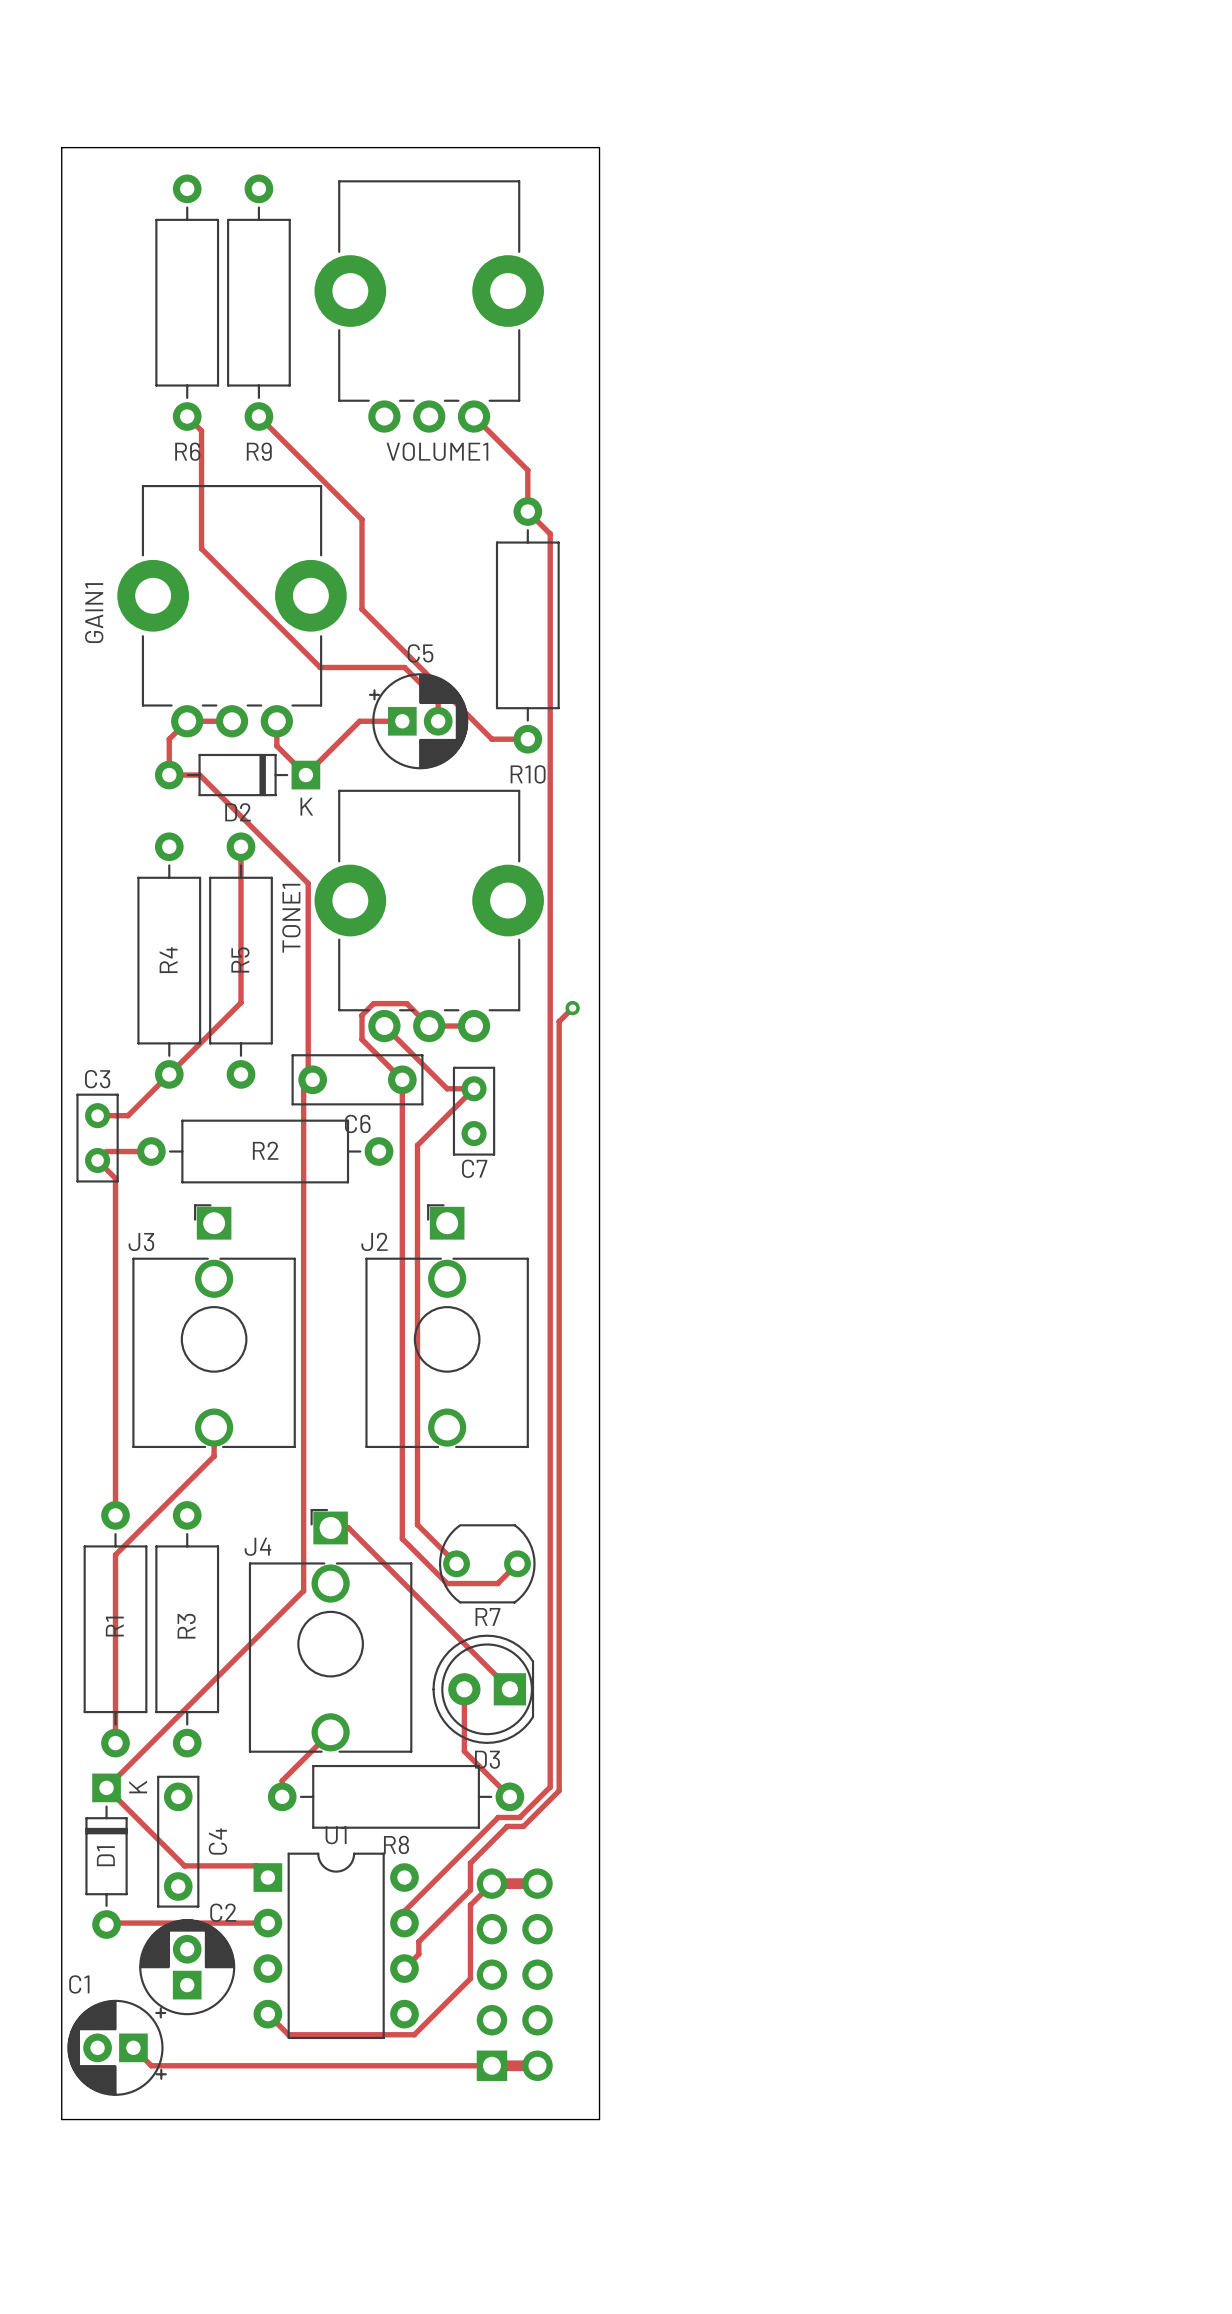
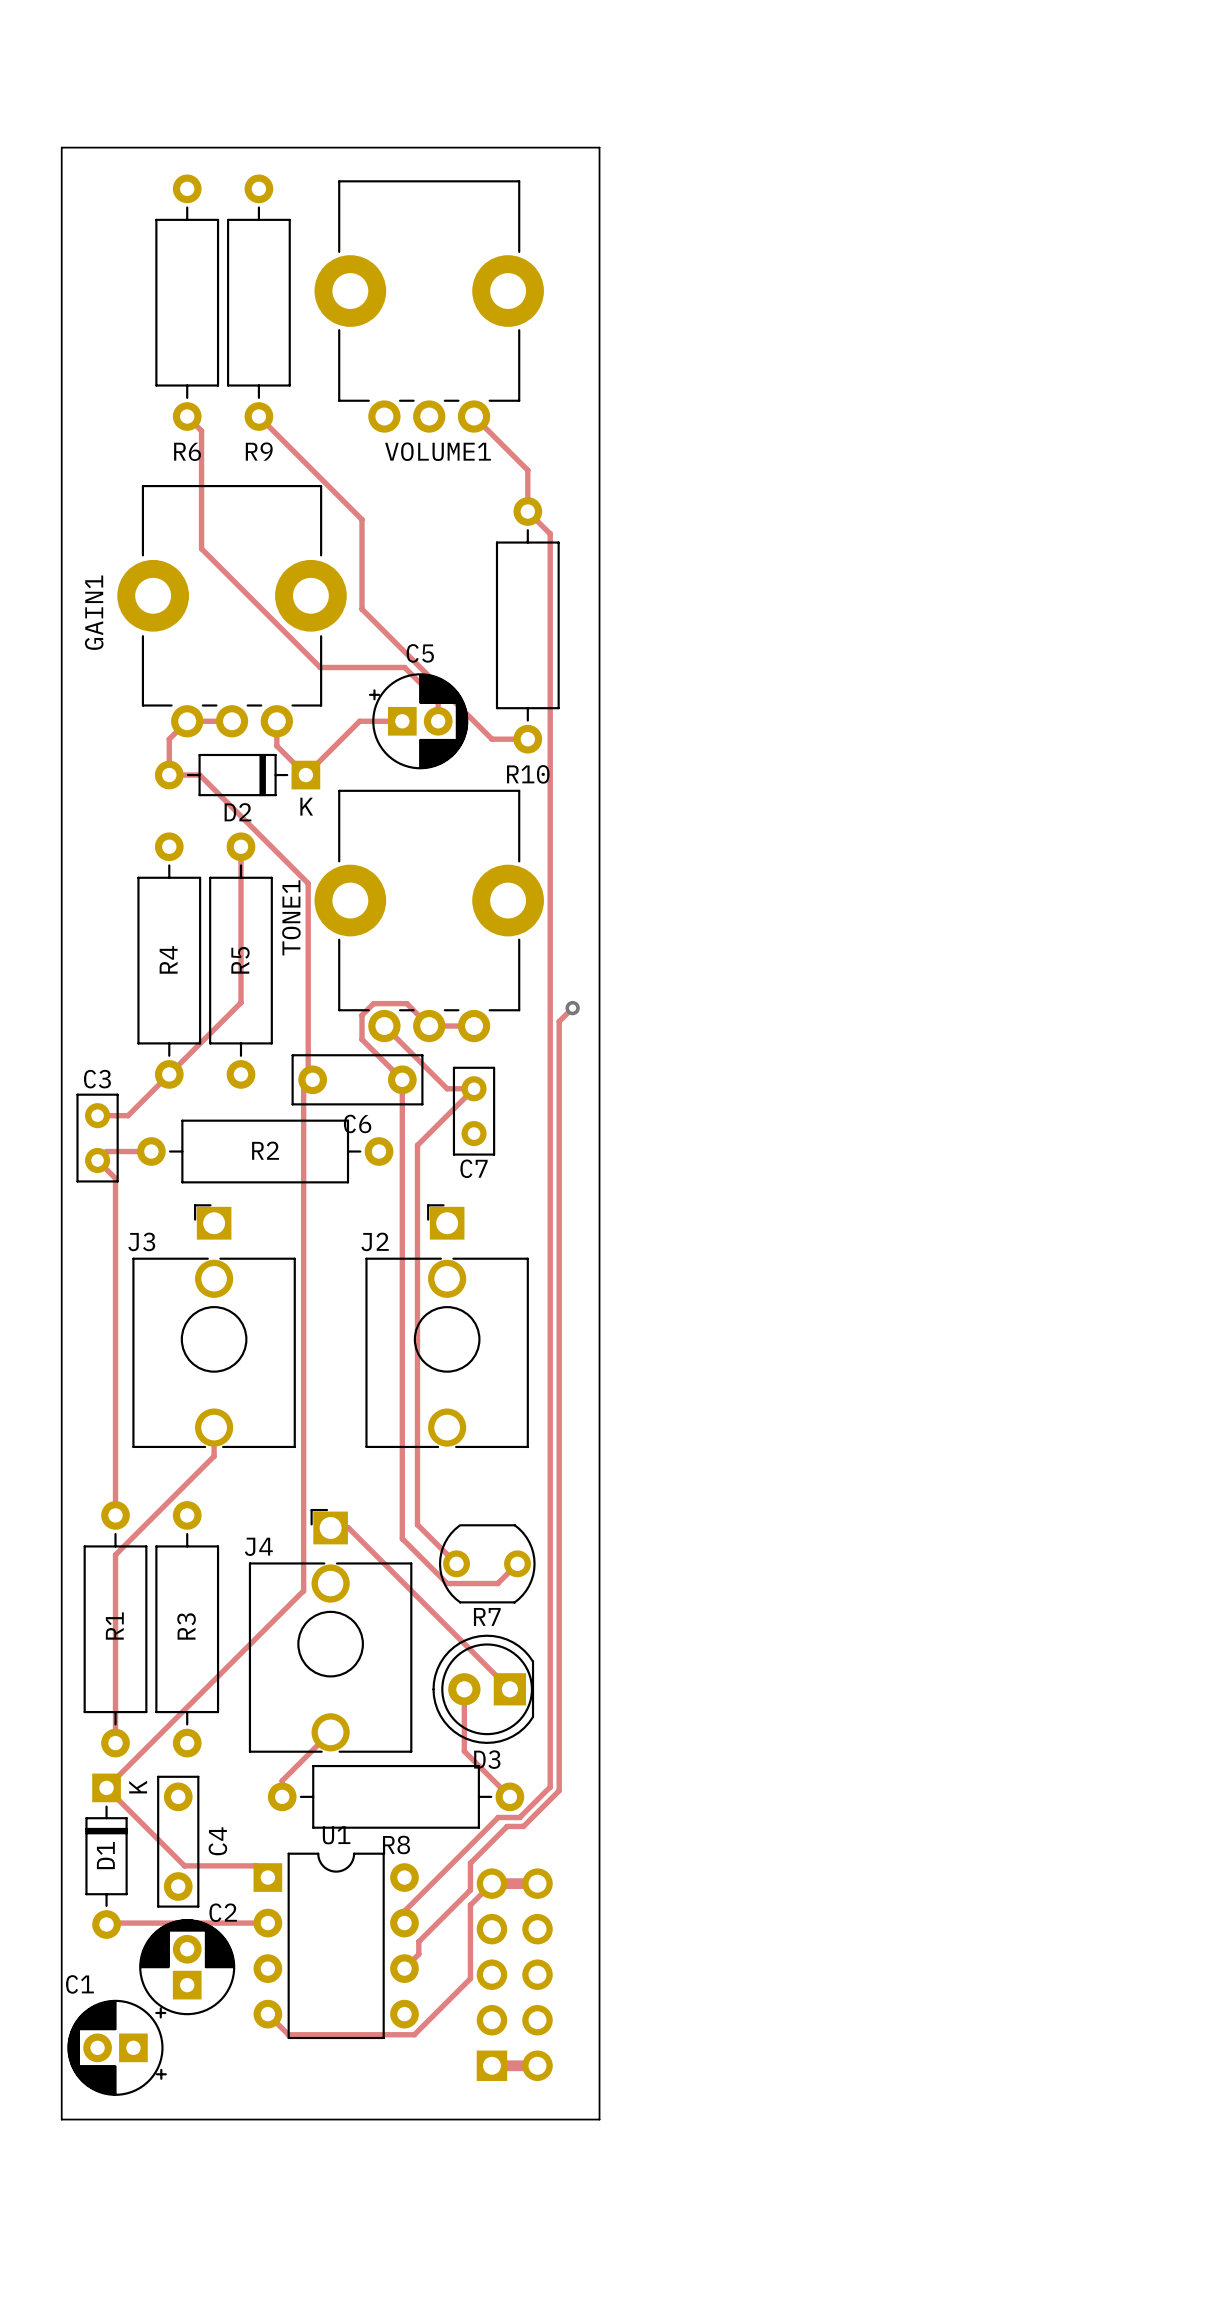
track: (133, 2047) (151, 2065) (491, 2065) -> none

